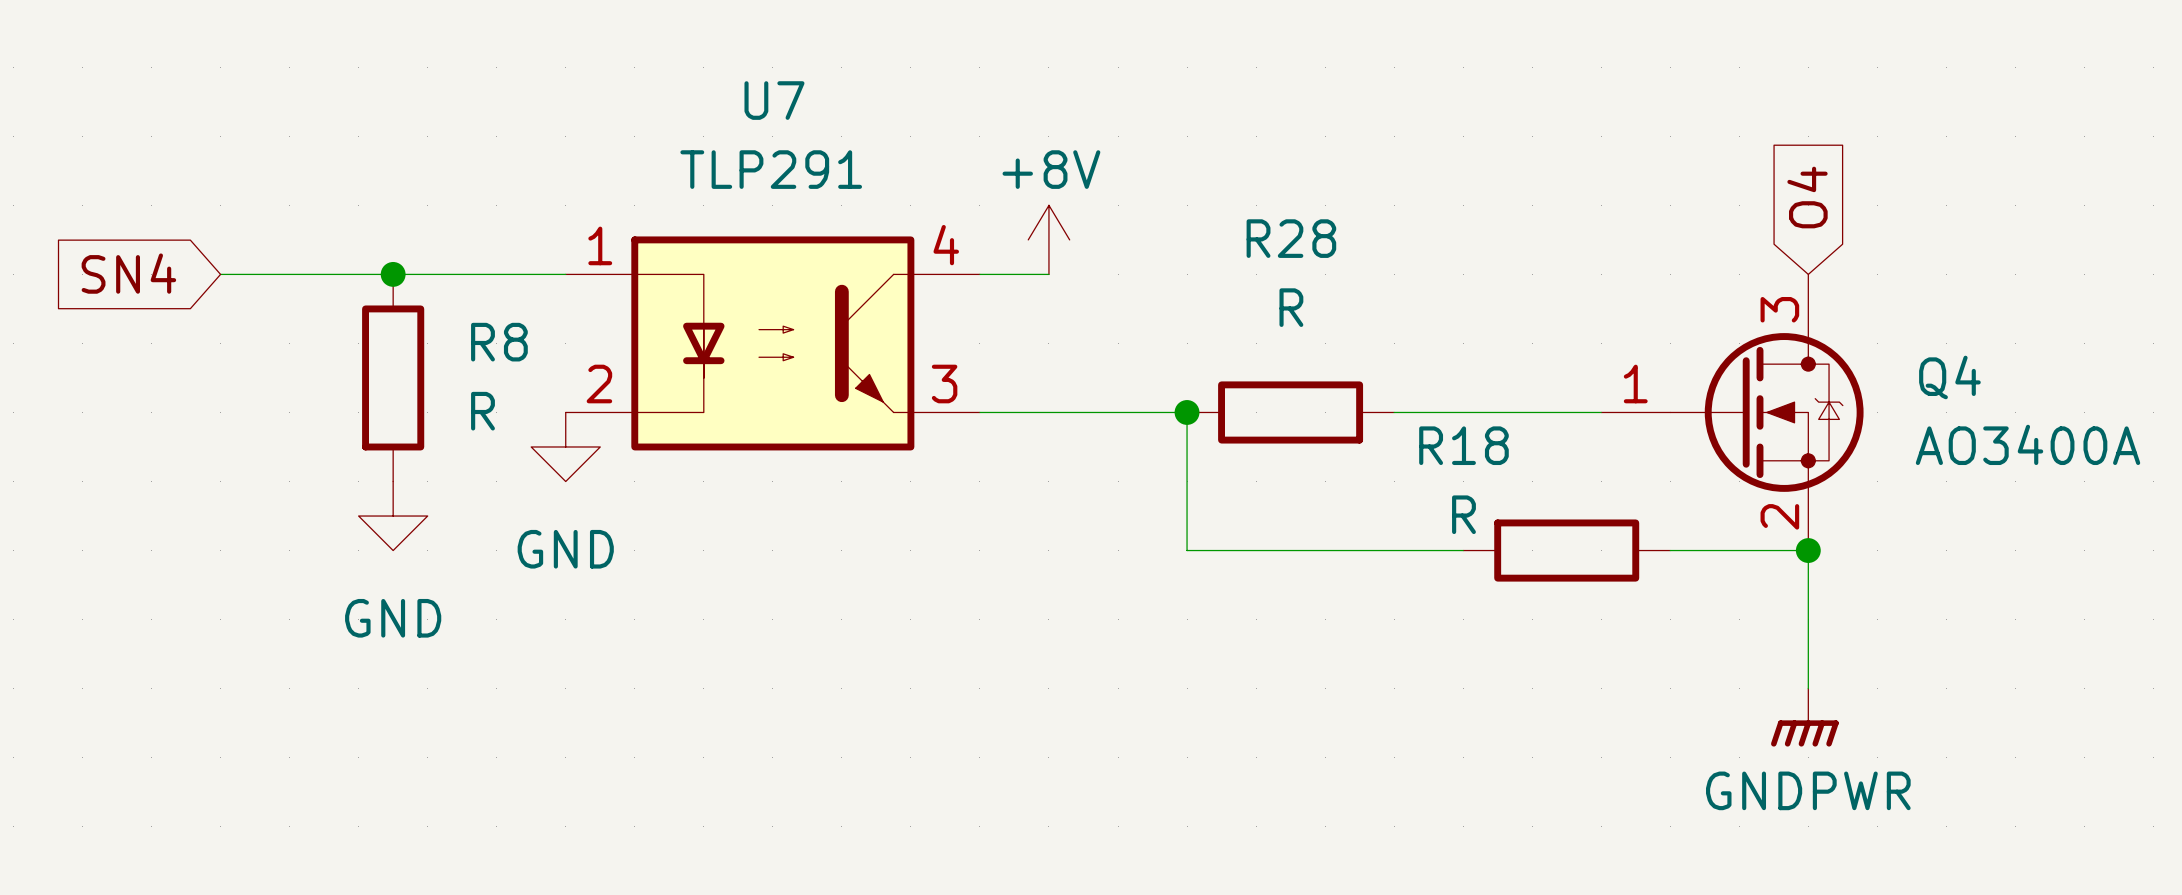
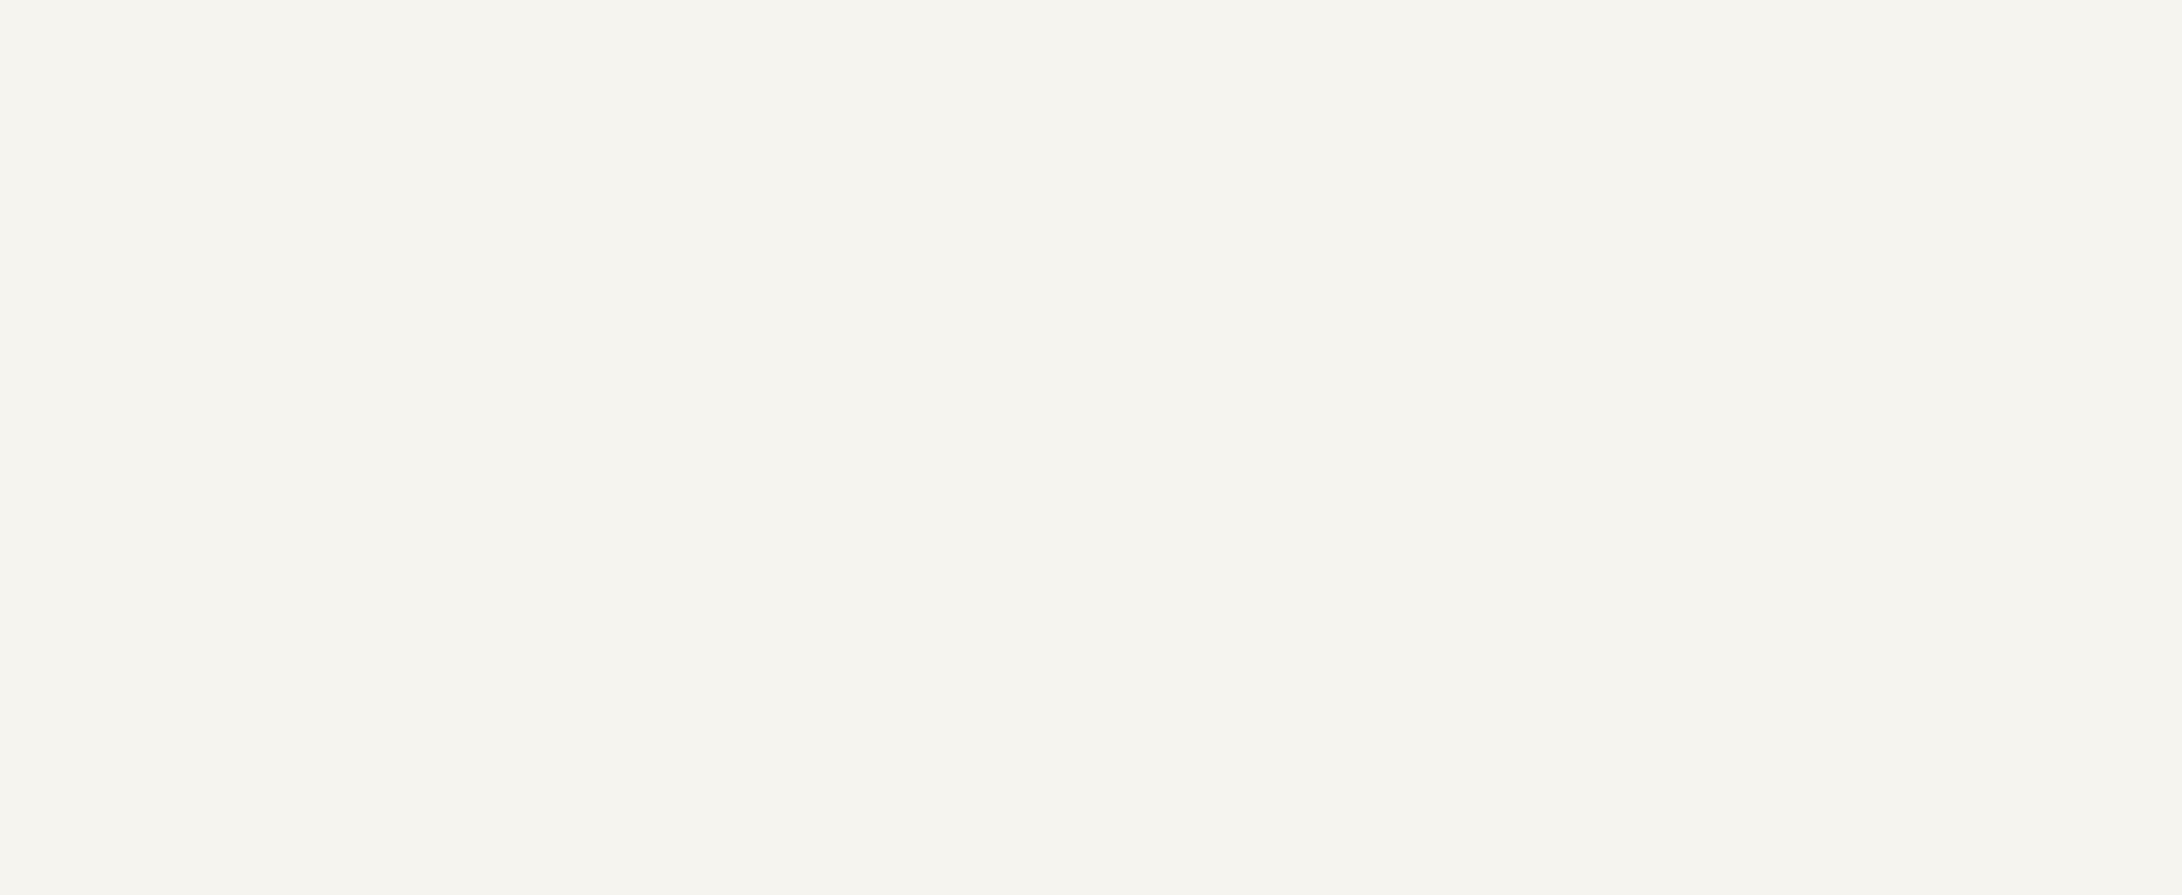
global label: O4 (1807, 197) -> none
power symbol: +8V (1048, 239) -> none
global label: SN4 (128, 273) -> none
wire: (220, 274) (565, 274) -> none
junction: (393, 274) -> none
wire: (979, 274) (1048, 274) -> none
U7: TLP291 (772, 343) -> none
R8: R (393, 377) -> none
wire: (979, 412) (1187, 412) (1187, 550) (1463, 550) -> none
junction: (1187, 412) -> none
R28: R (1290, 412) -> none
wire: (1394, 412) (1601, 412) -> none
Q4: AO3400A (1732, 412) -> none
power symbol: GND (565, 446) -> none
power symbol: GND (393, 516) -> none
R18: R (1566, 550) -> none
wire: (1670, 550) (1808, 550) (1808, 688) -> none
junction: (1808, 550) -> none
power symbol: GNDPWR (1804, 717) -> none

